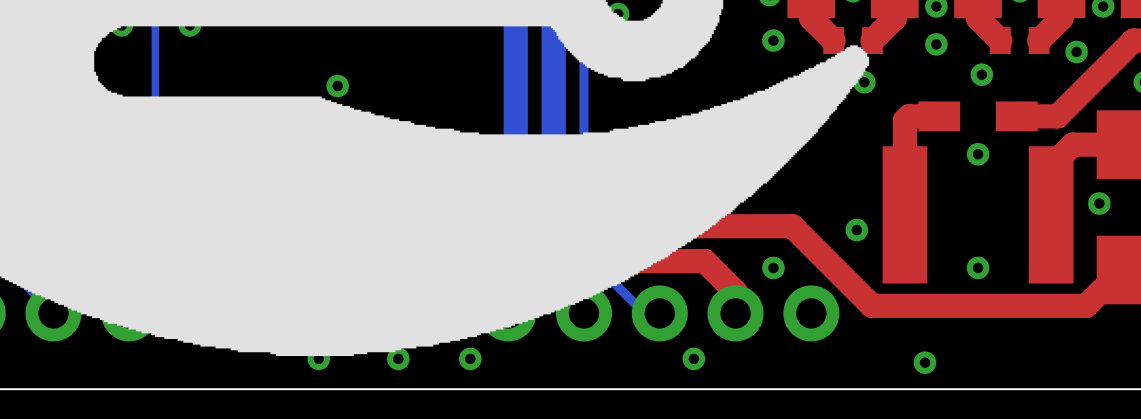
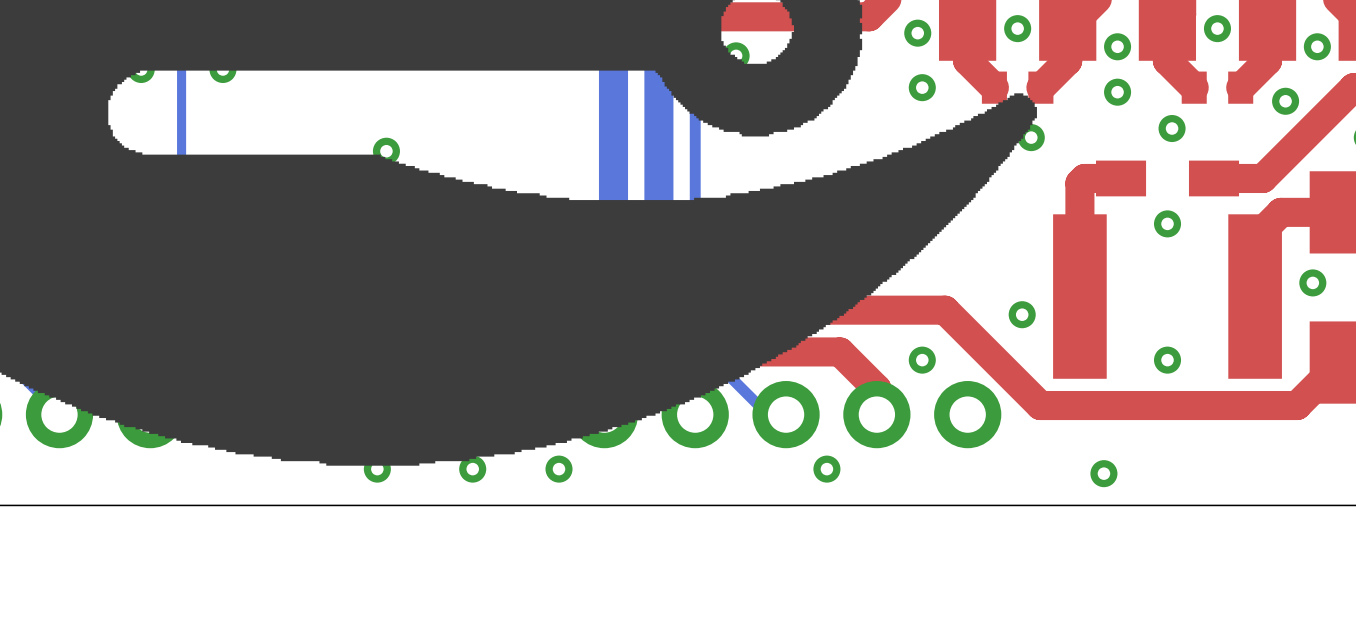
via position: (337, 86) -> (386, 151)

